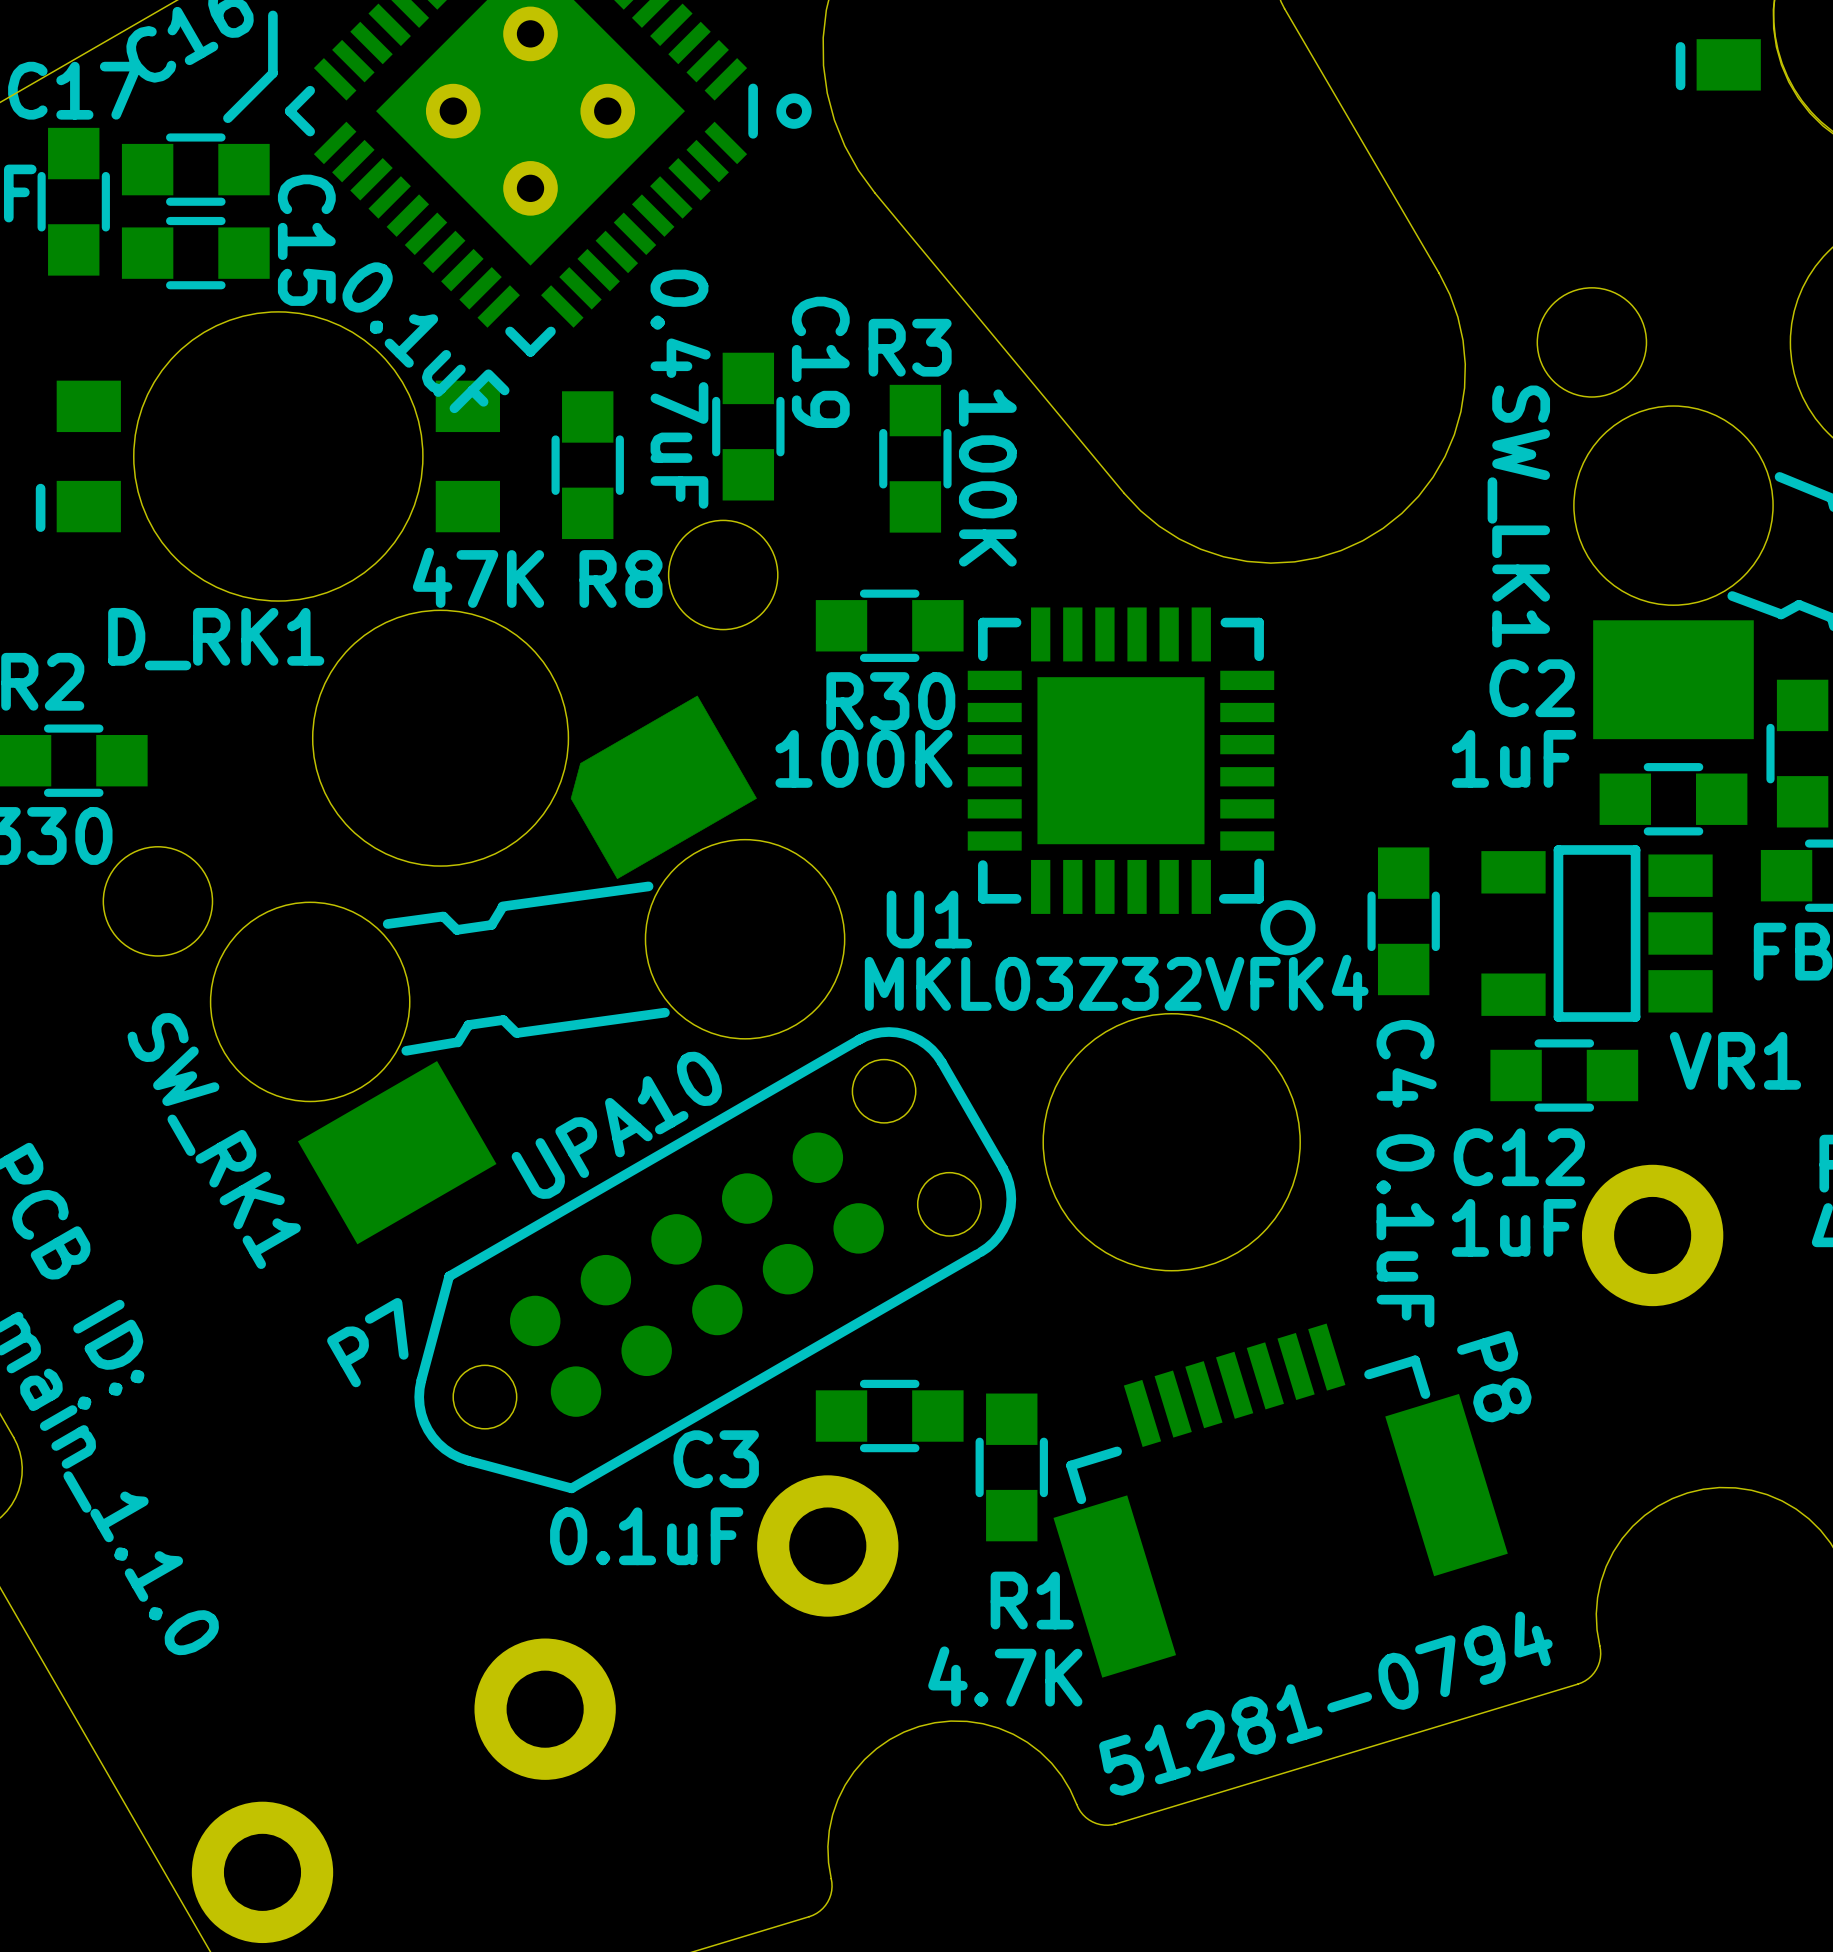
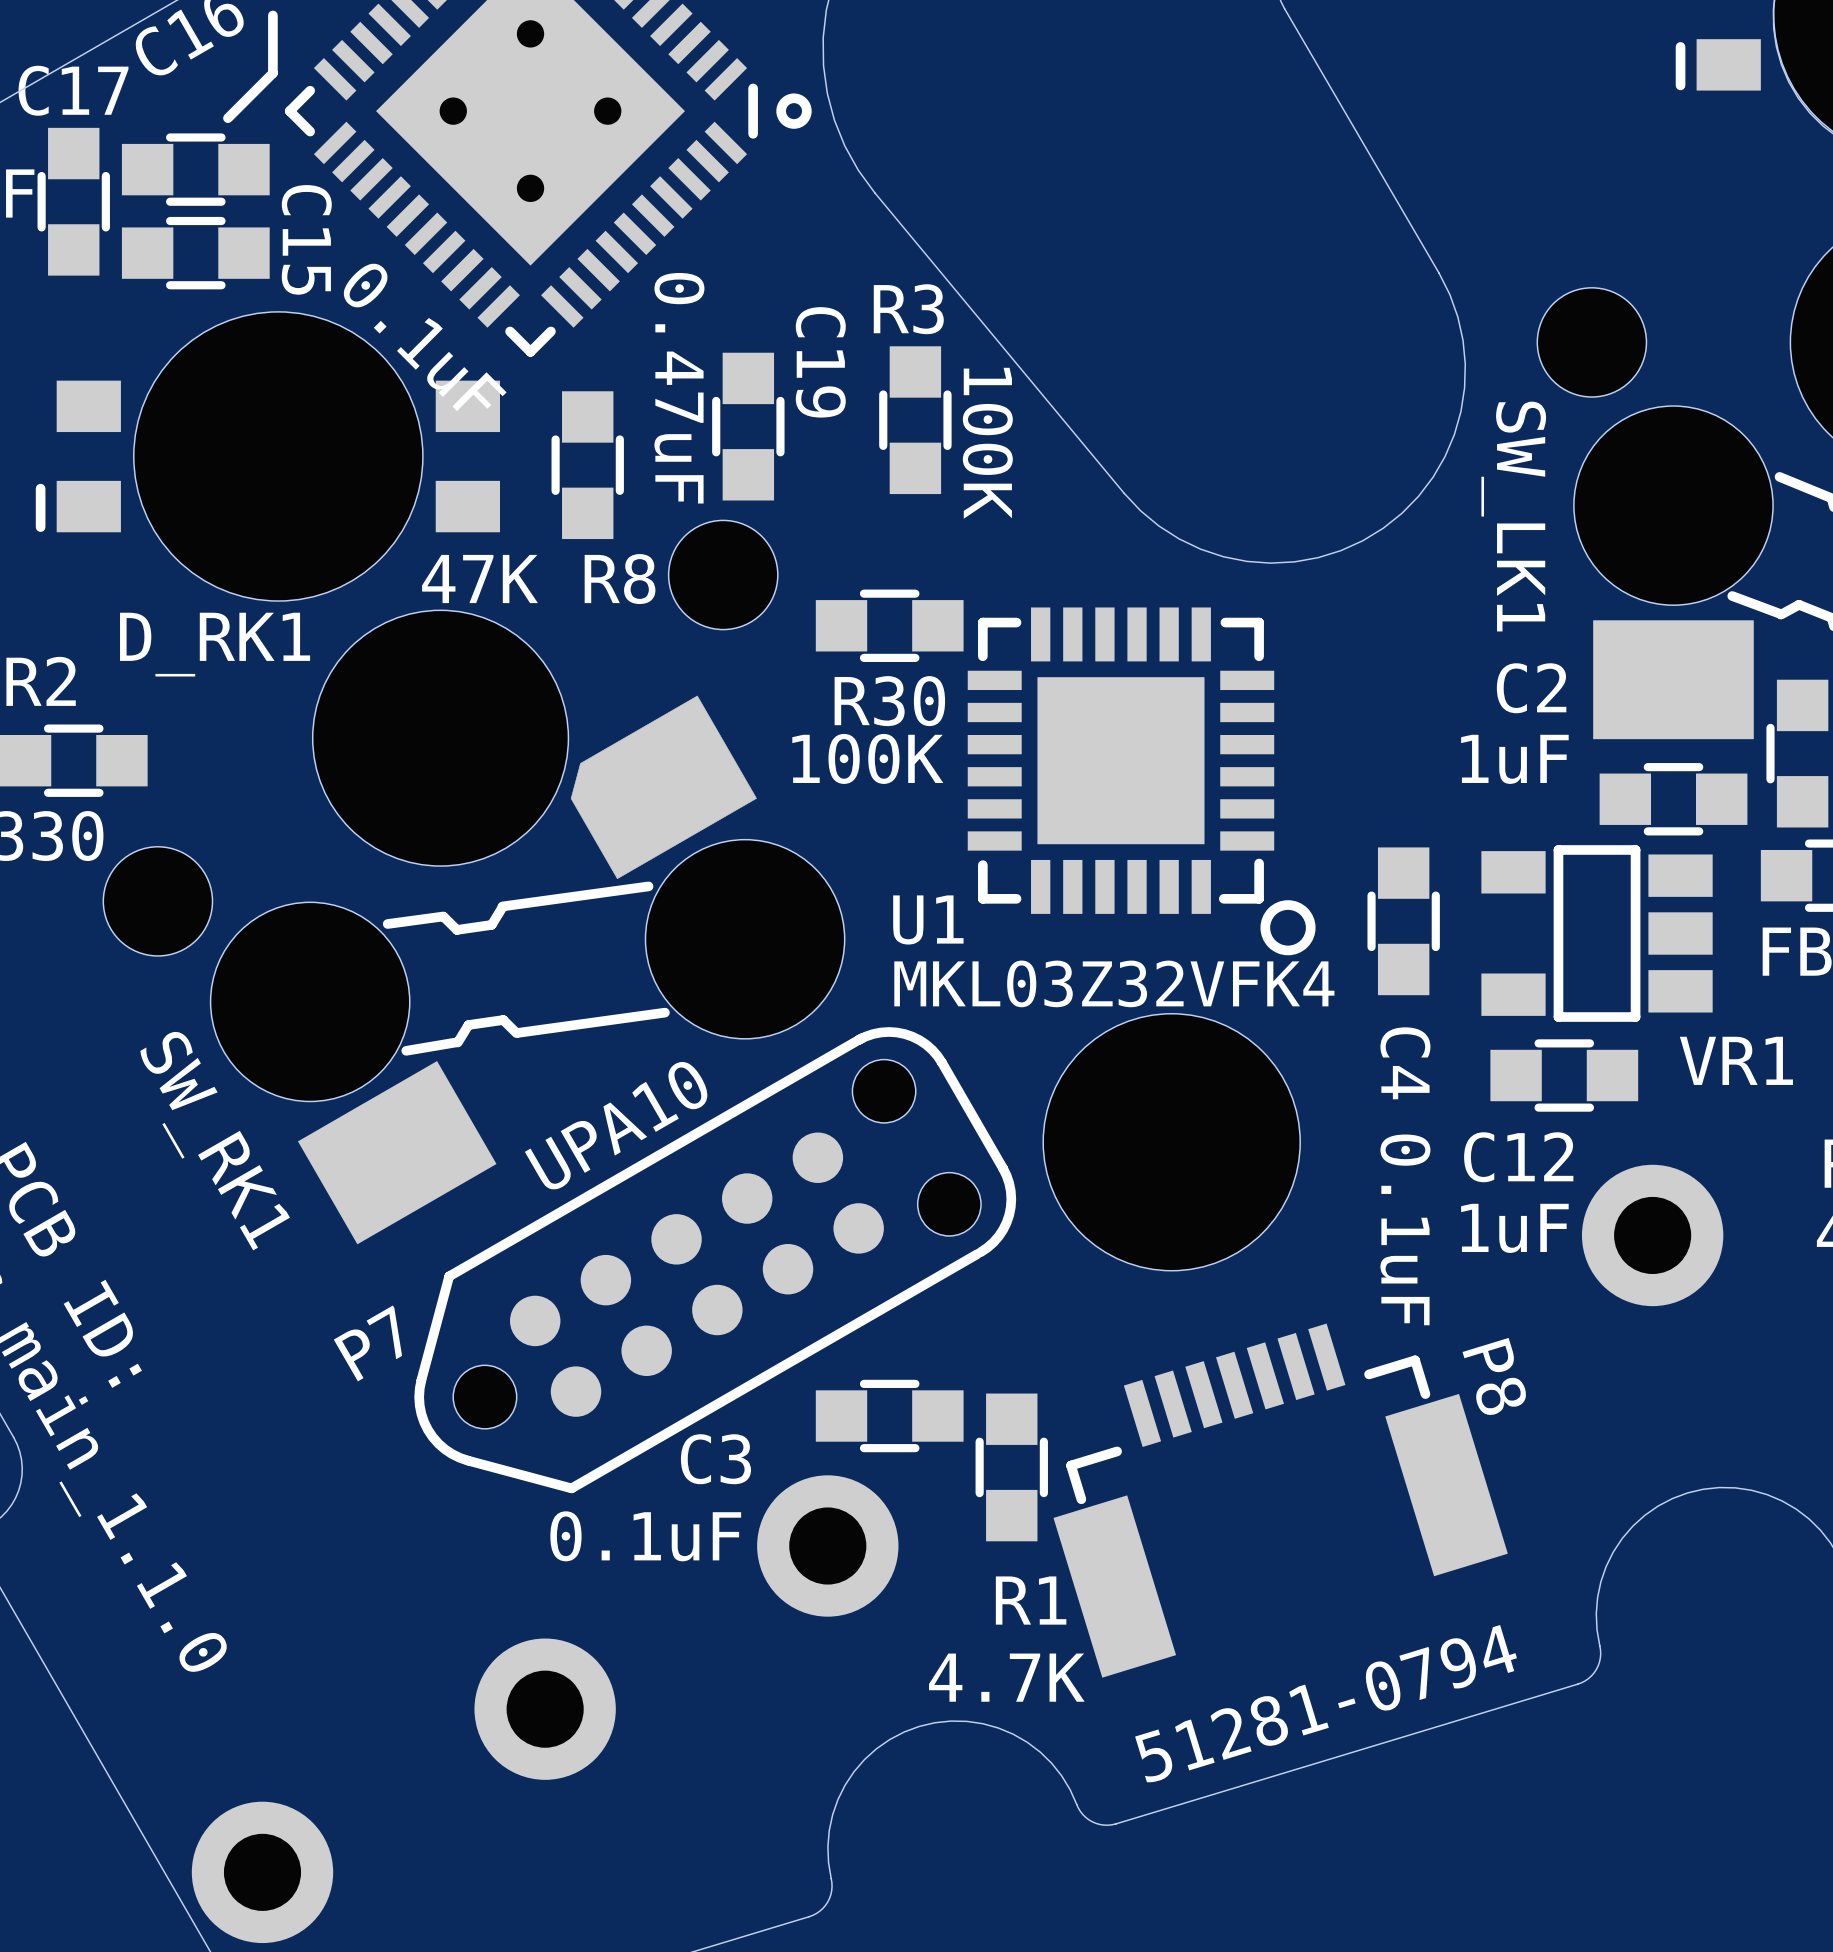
R3 position: (915, 458) -> (915, 420)

